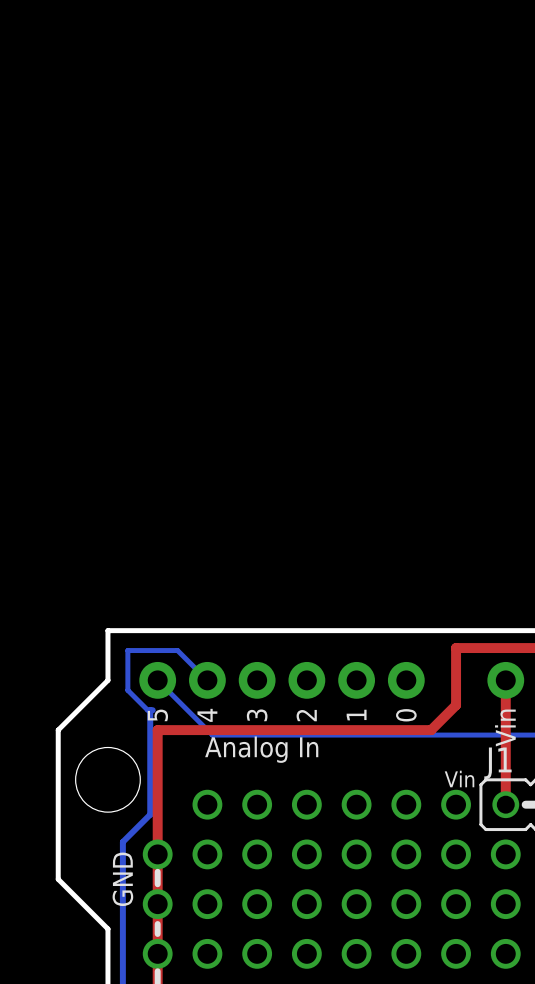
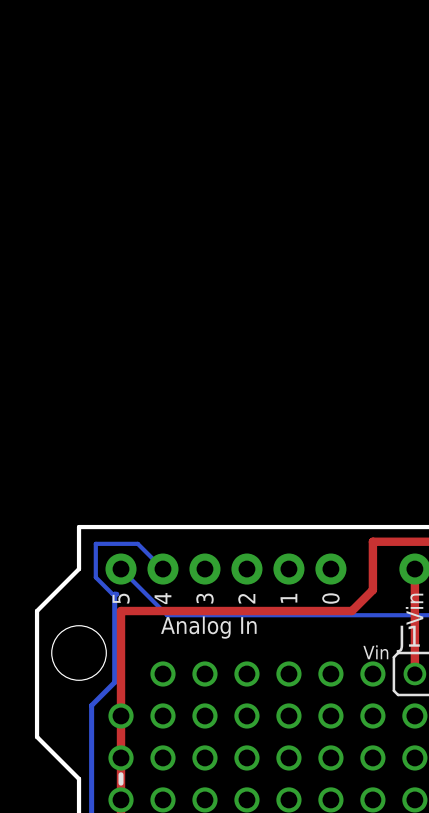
line: (157, 871) (157, 884) -> none
text: GND (122, 879) -> none

